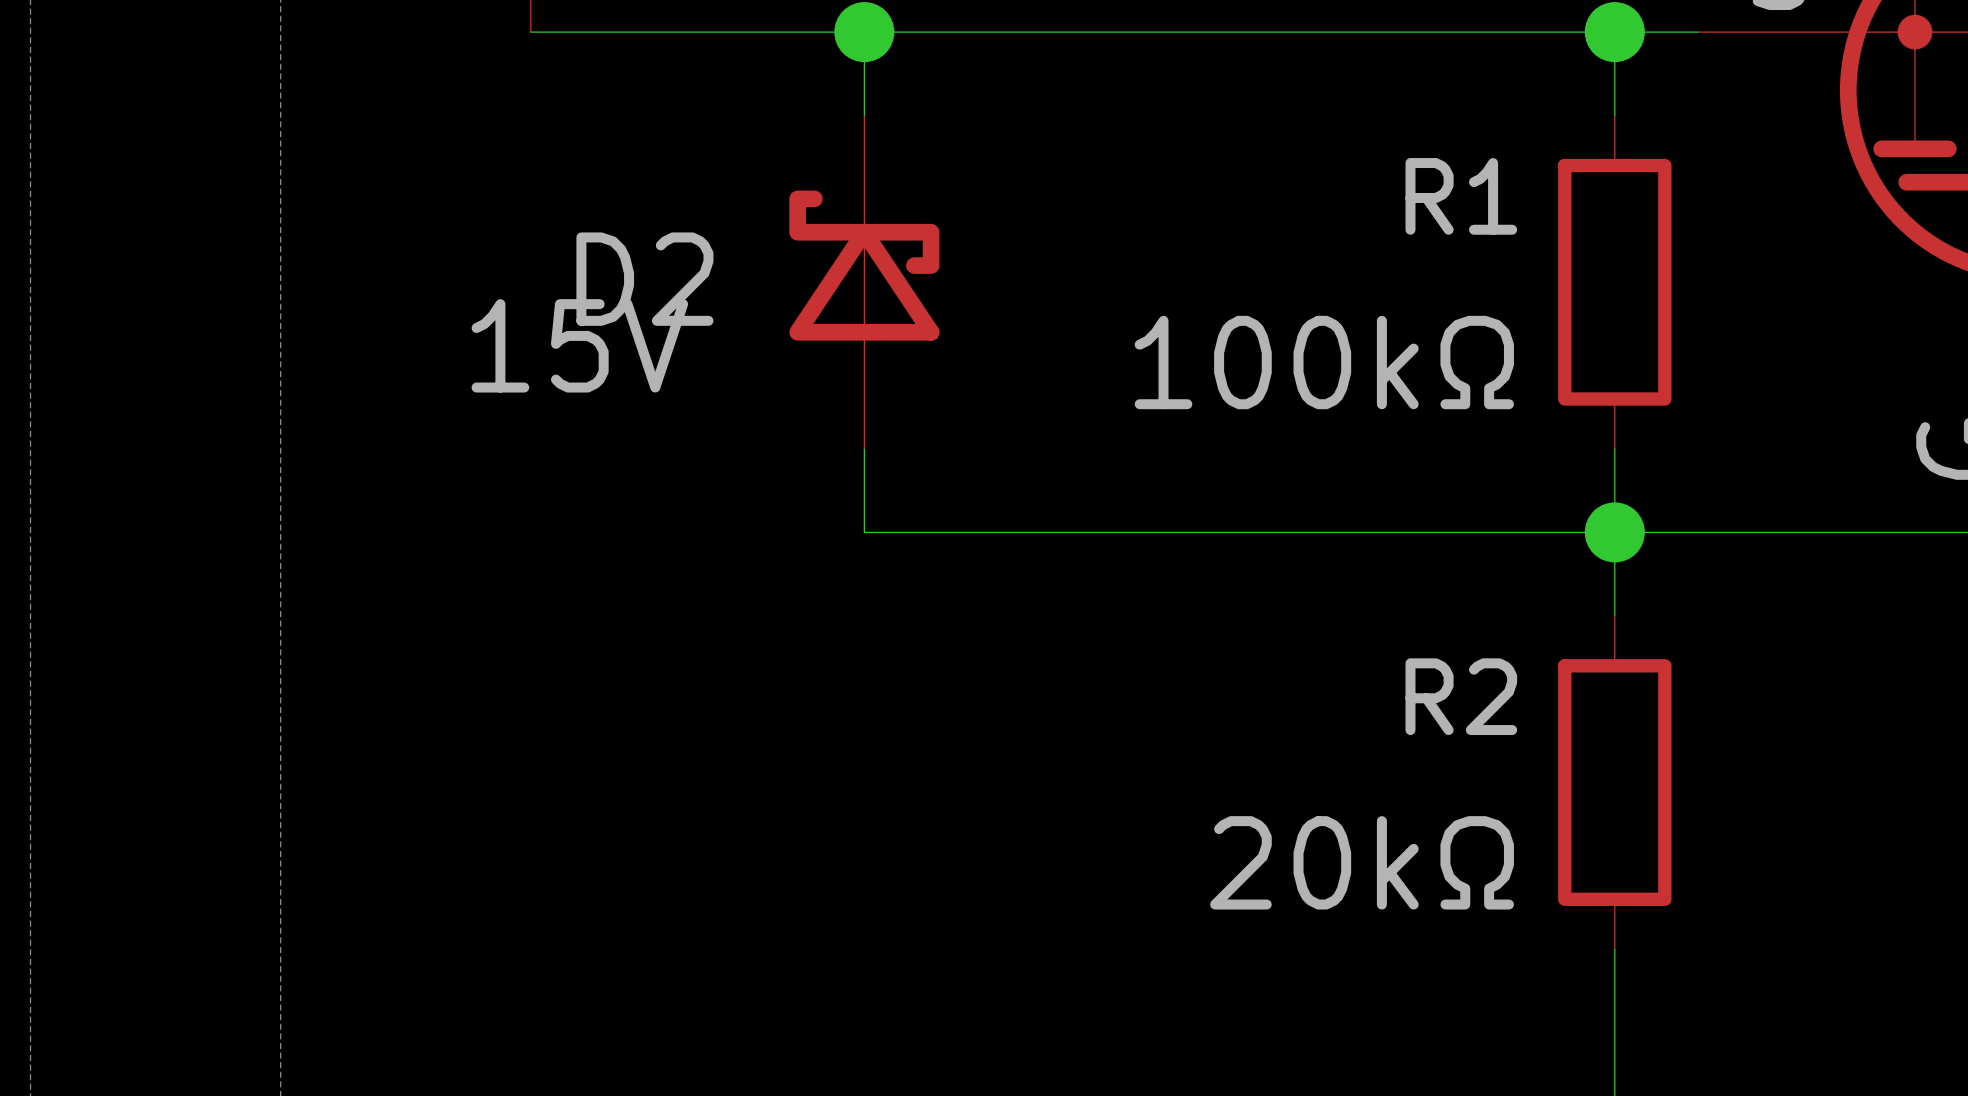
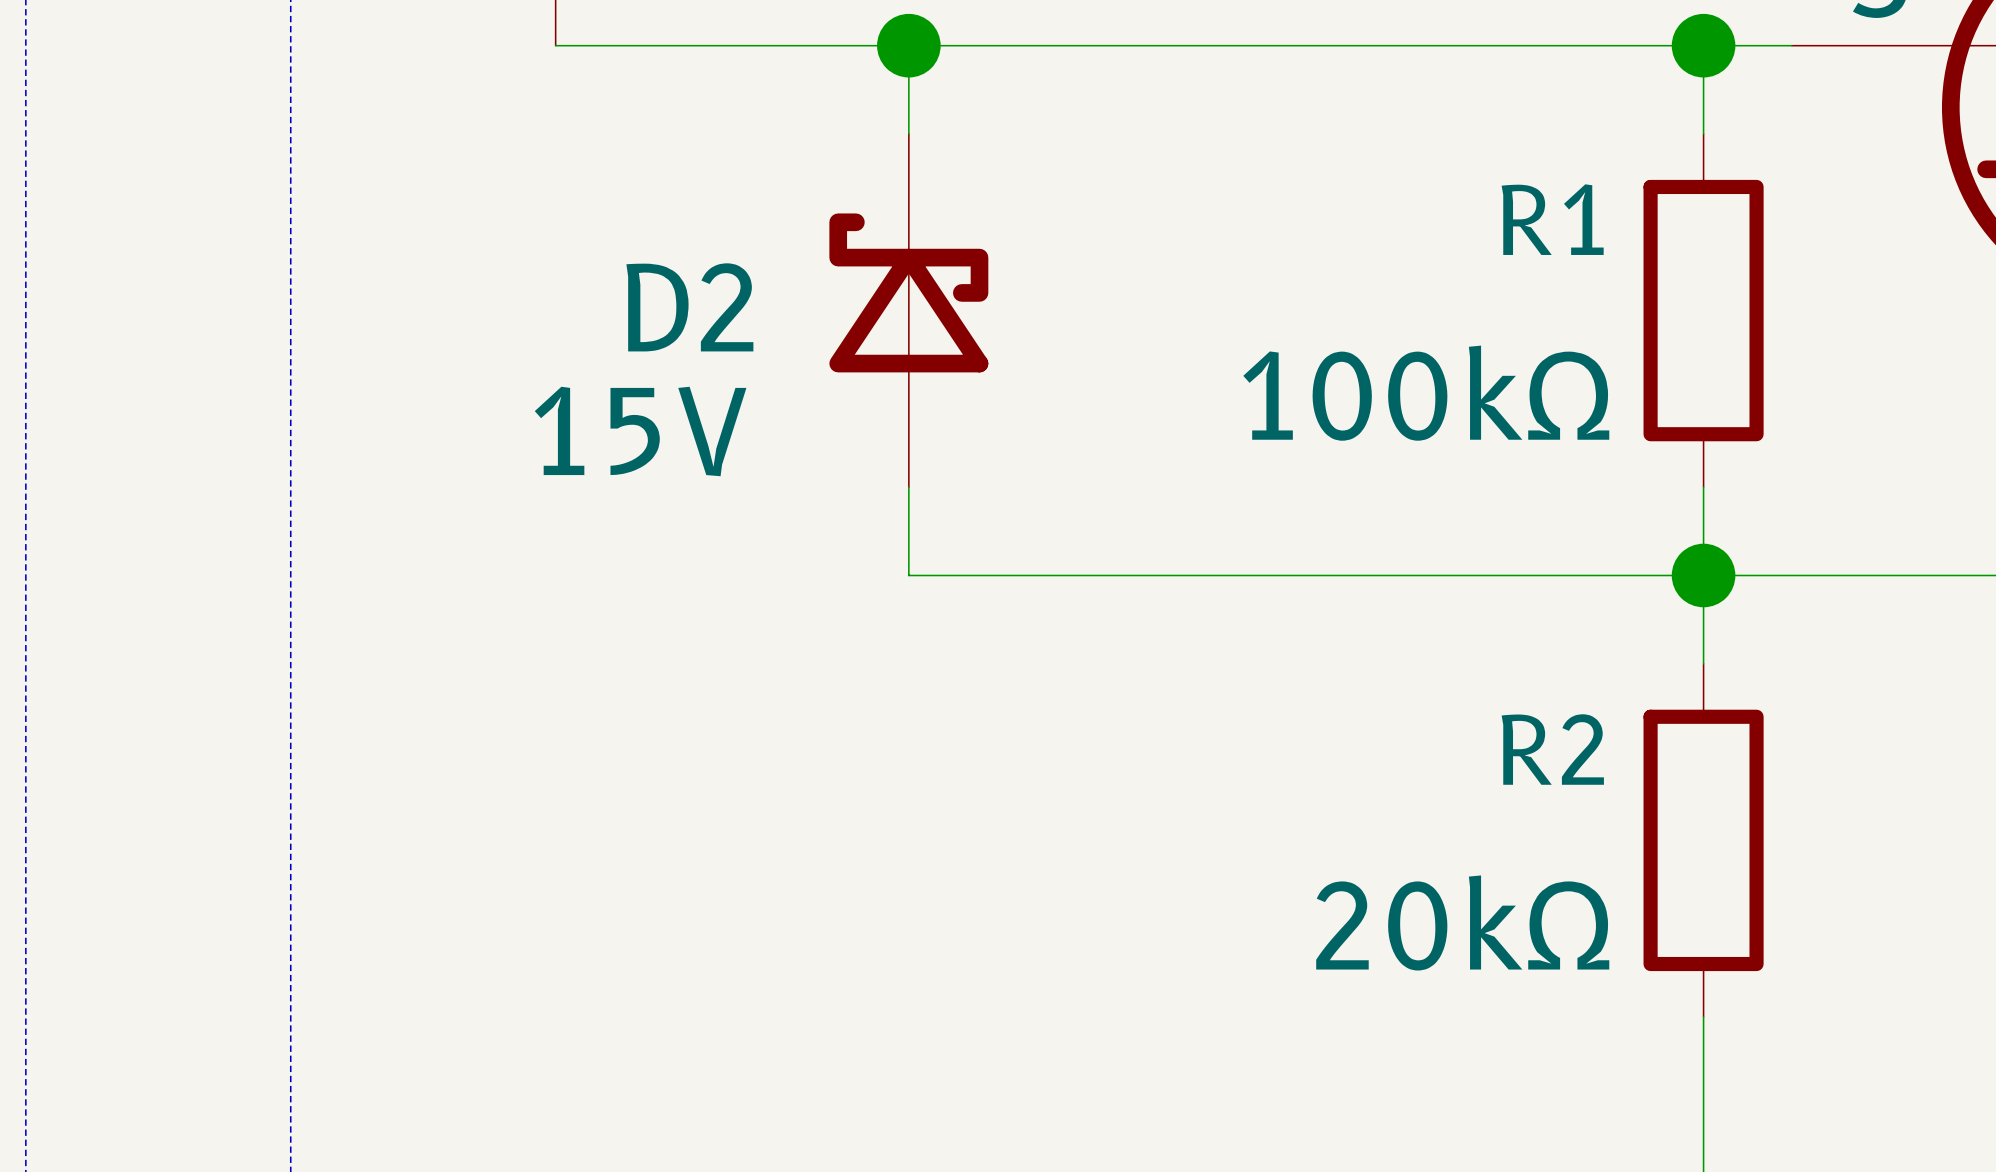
D2 value position: 15V (579, 345) -> 15V (640, 431)

